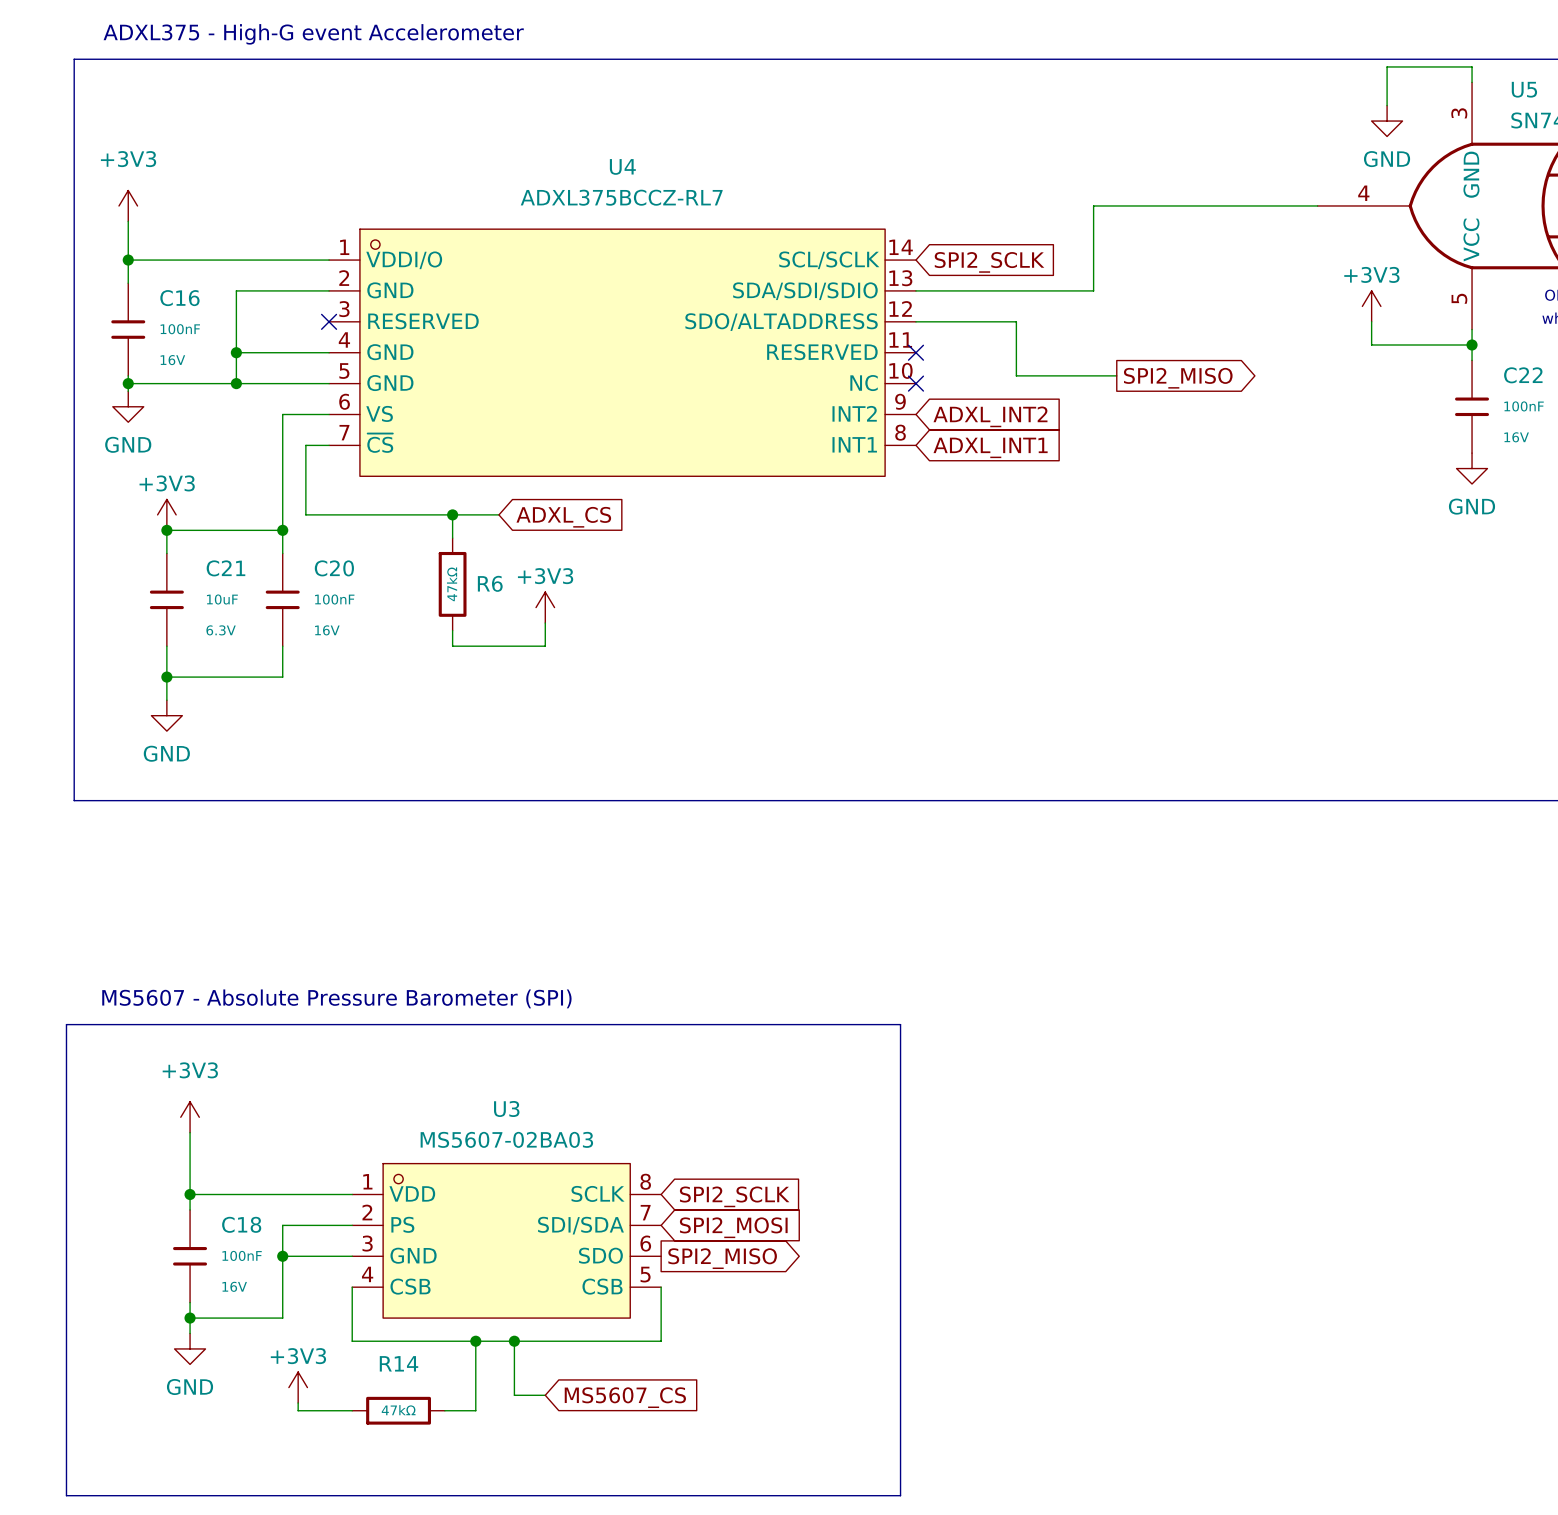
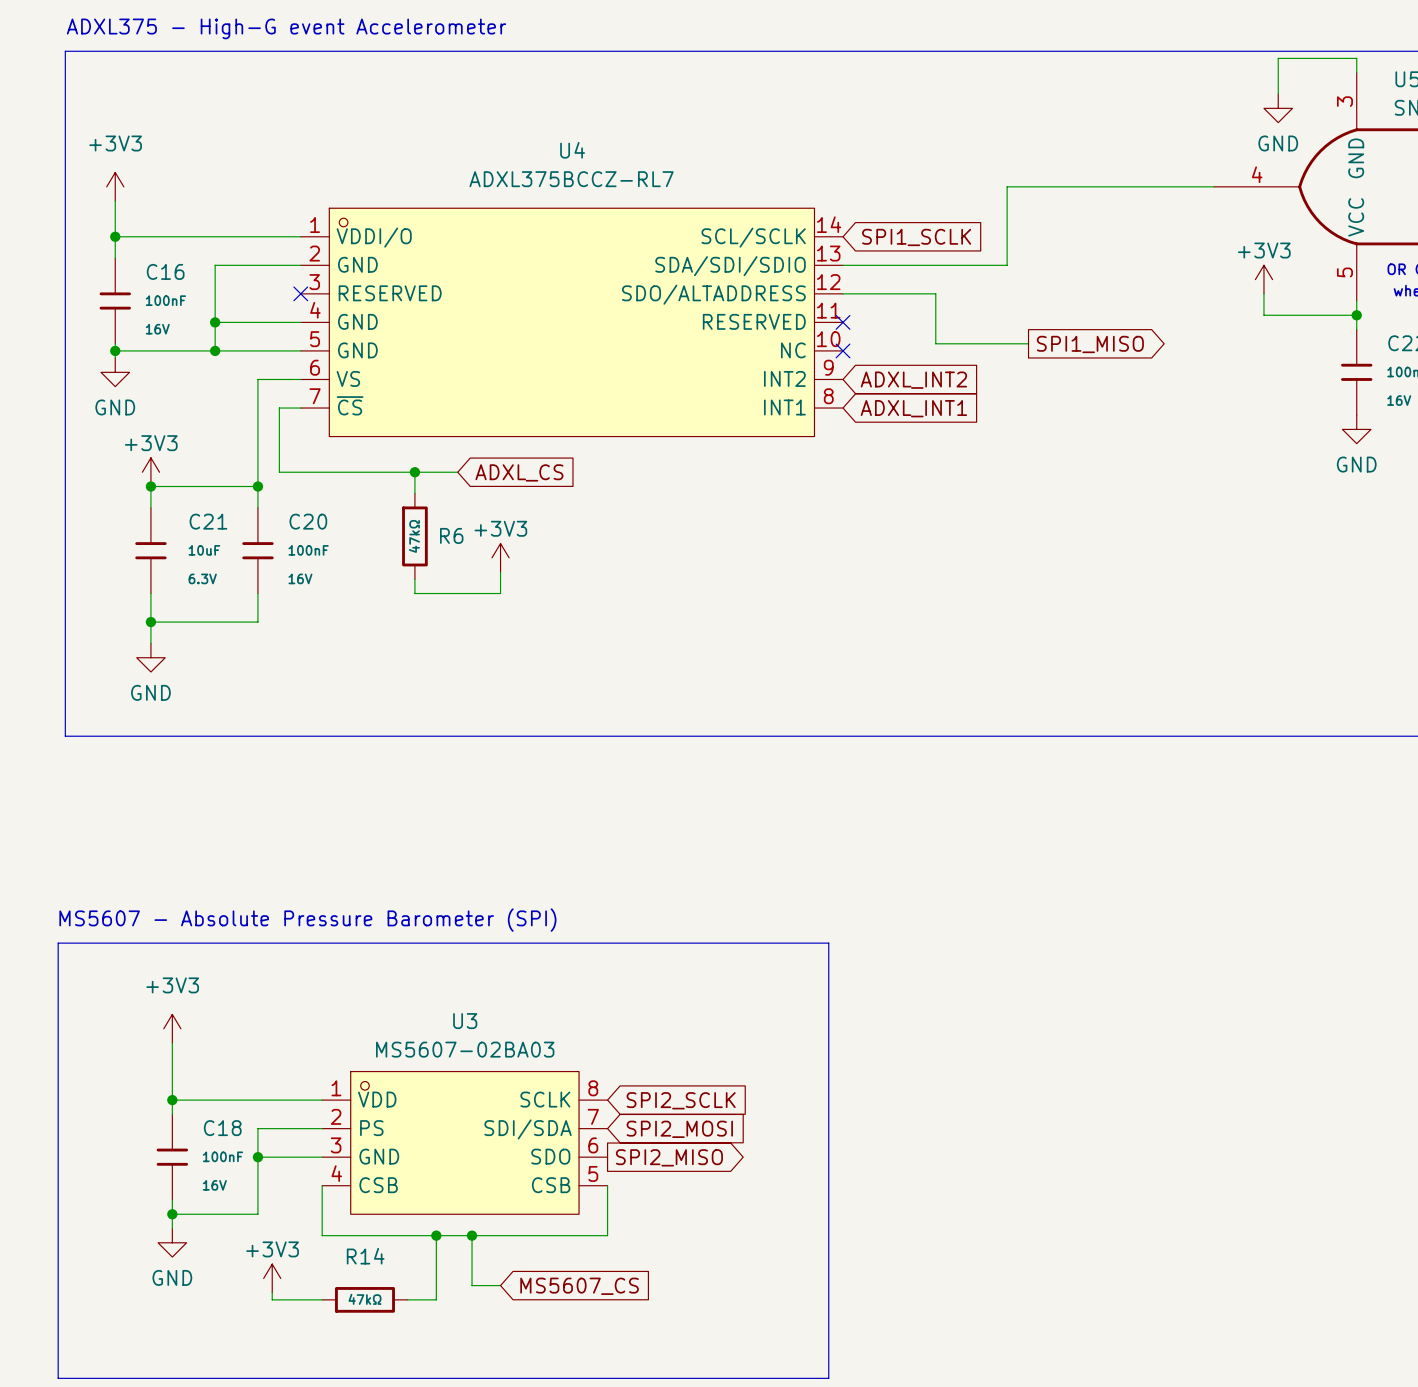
global label: SPI2_SCLK (989, 262) -> SPI1_SCLK (916, 237)
global label: SPI2_MISO (1178, 378) -> SPI1_MISO (1090, 344)

